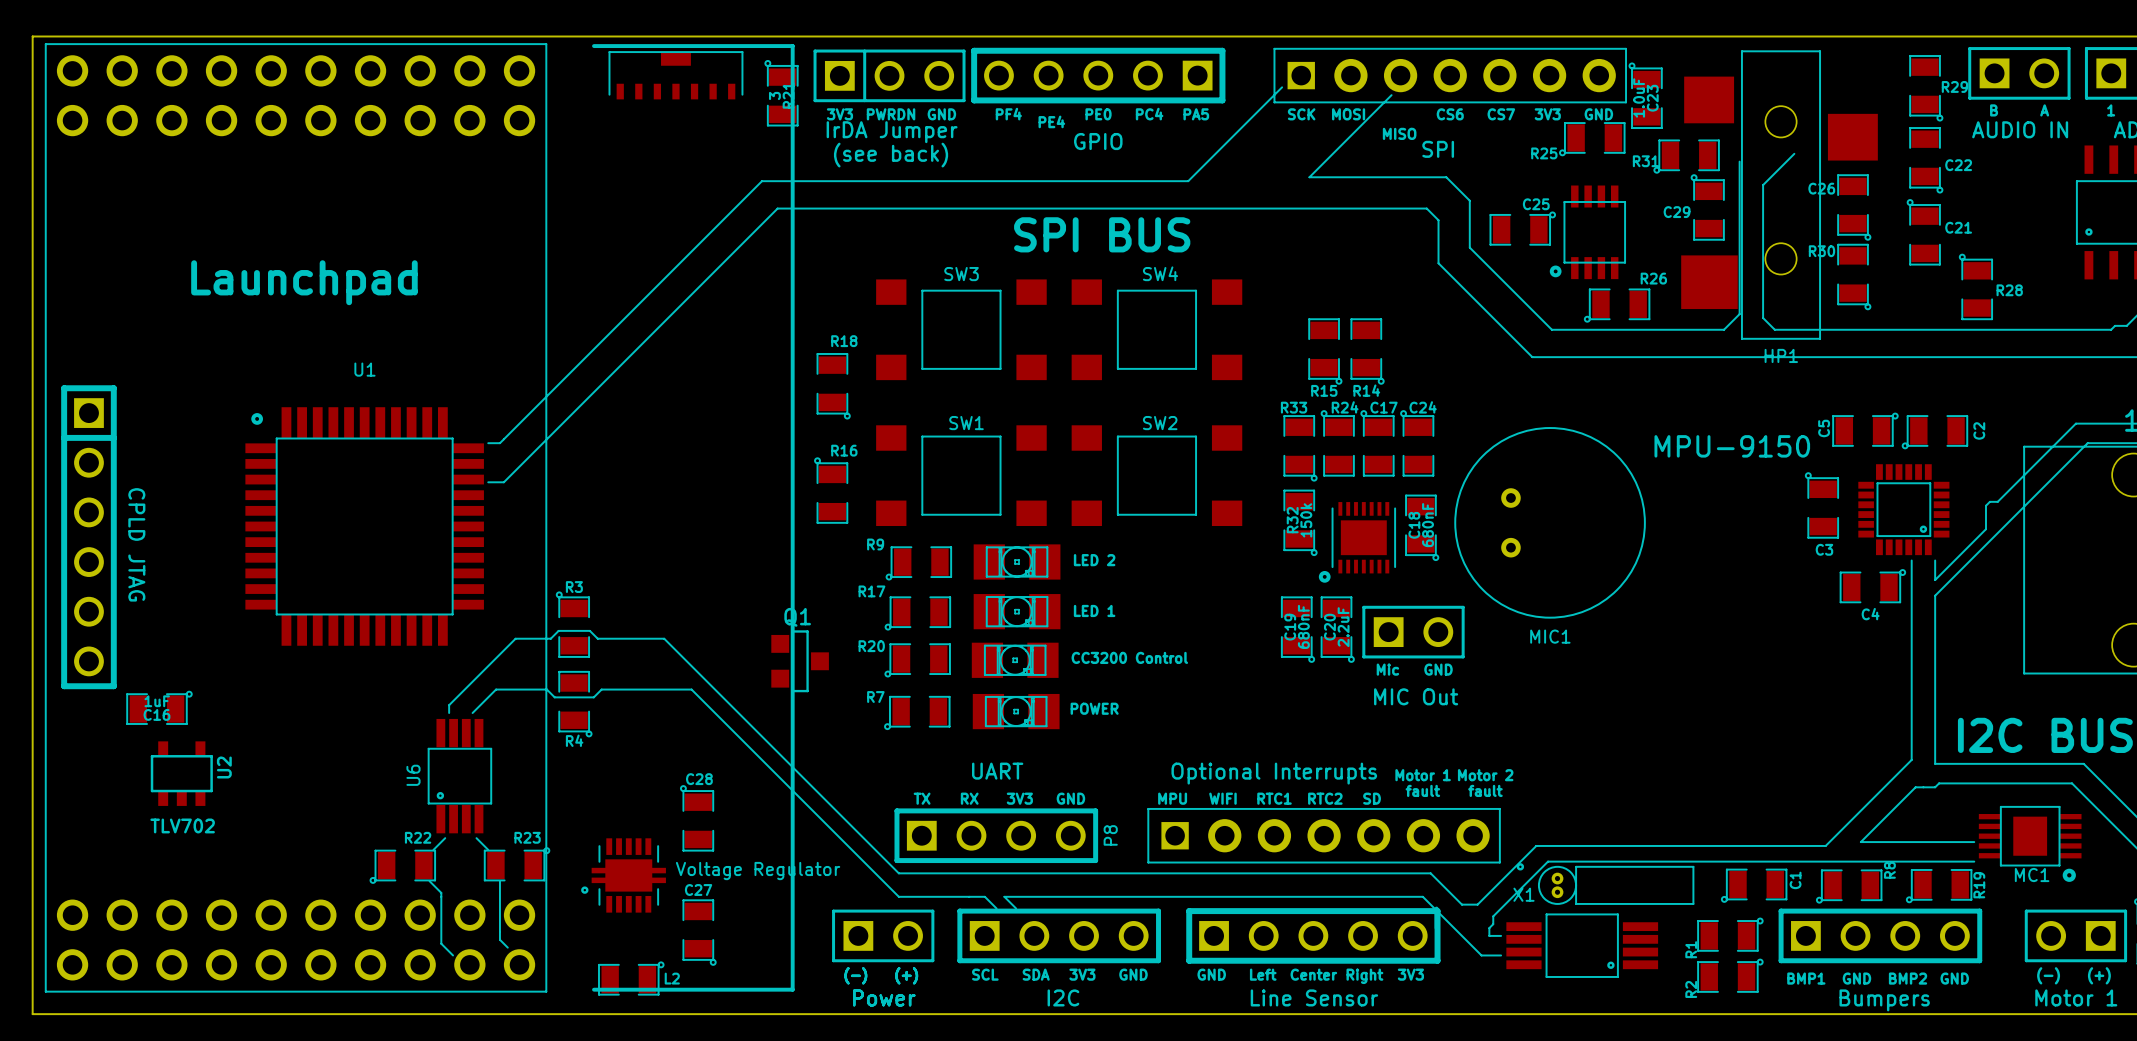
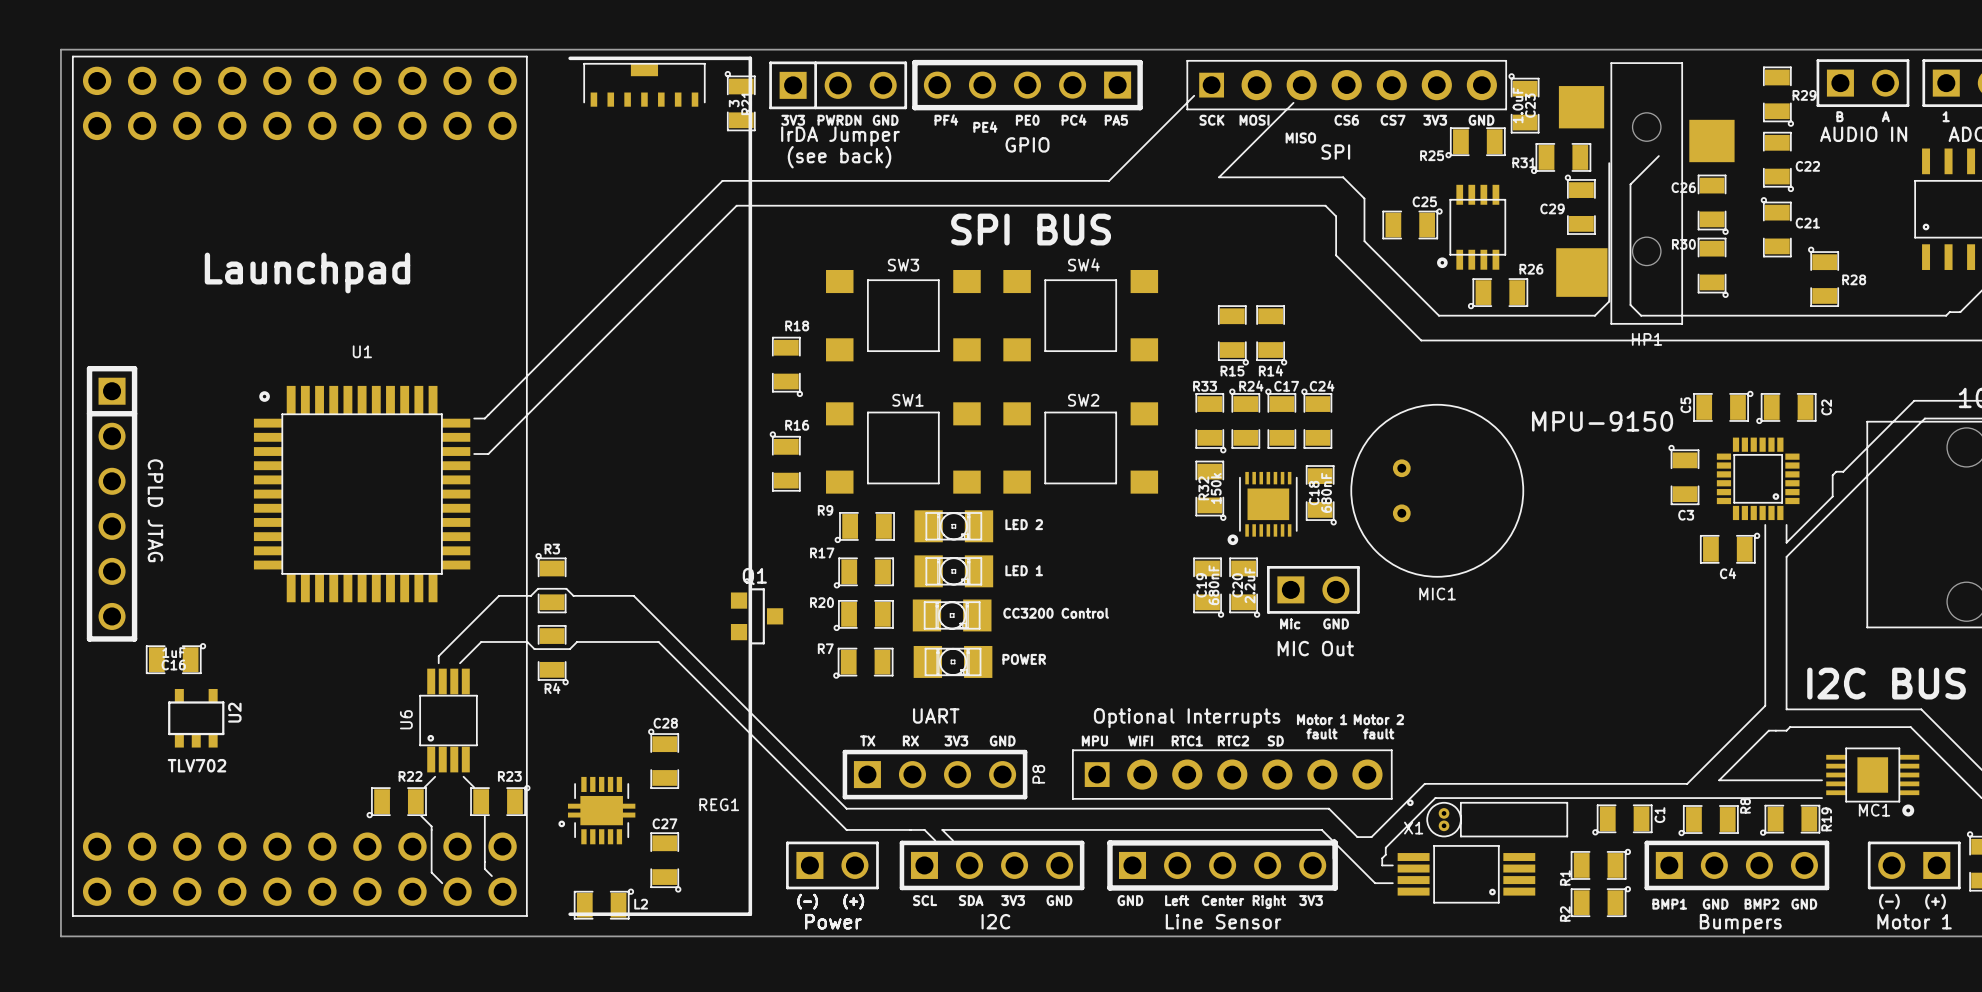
Voltage Regulator name: Voltage Regulator (758, 871) -> REG1 (719, 804)

